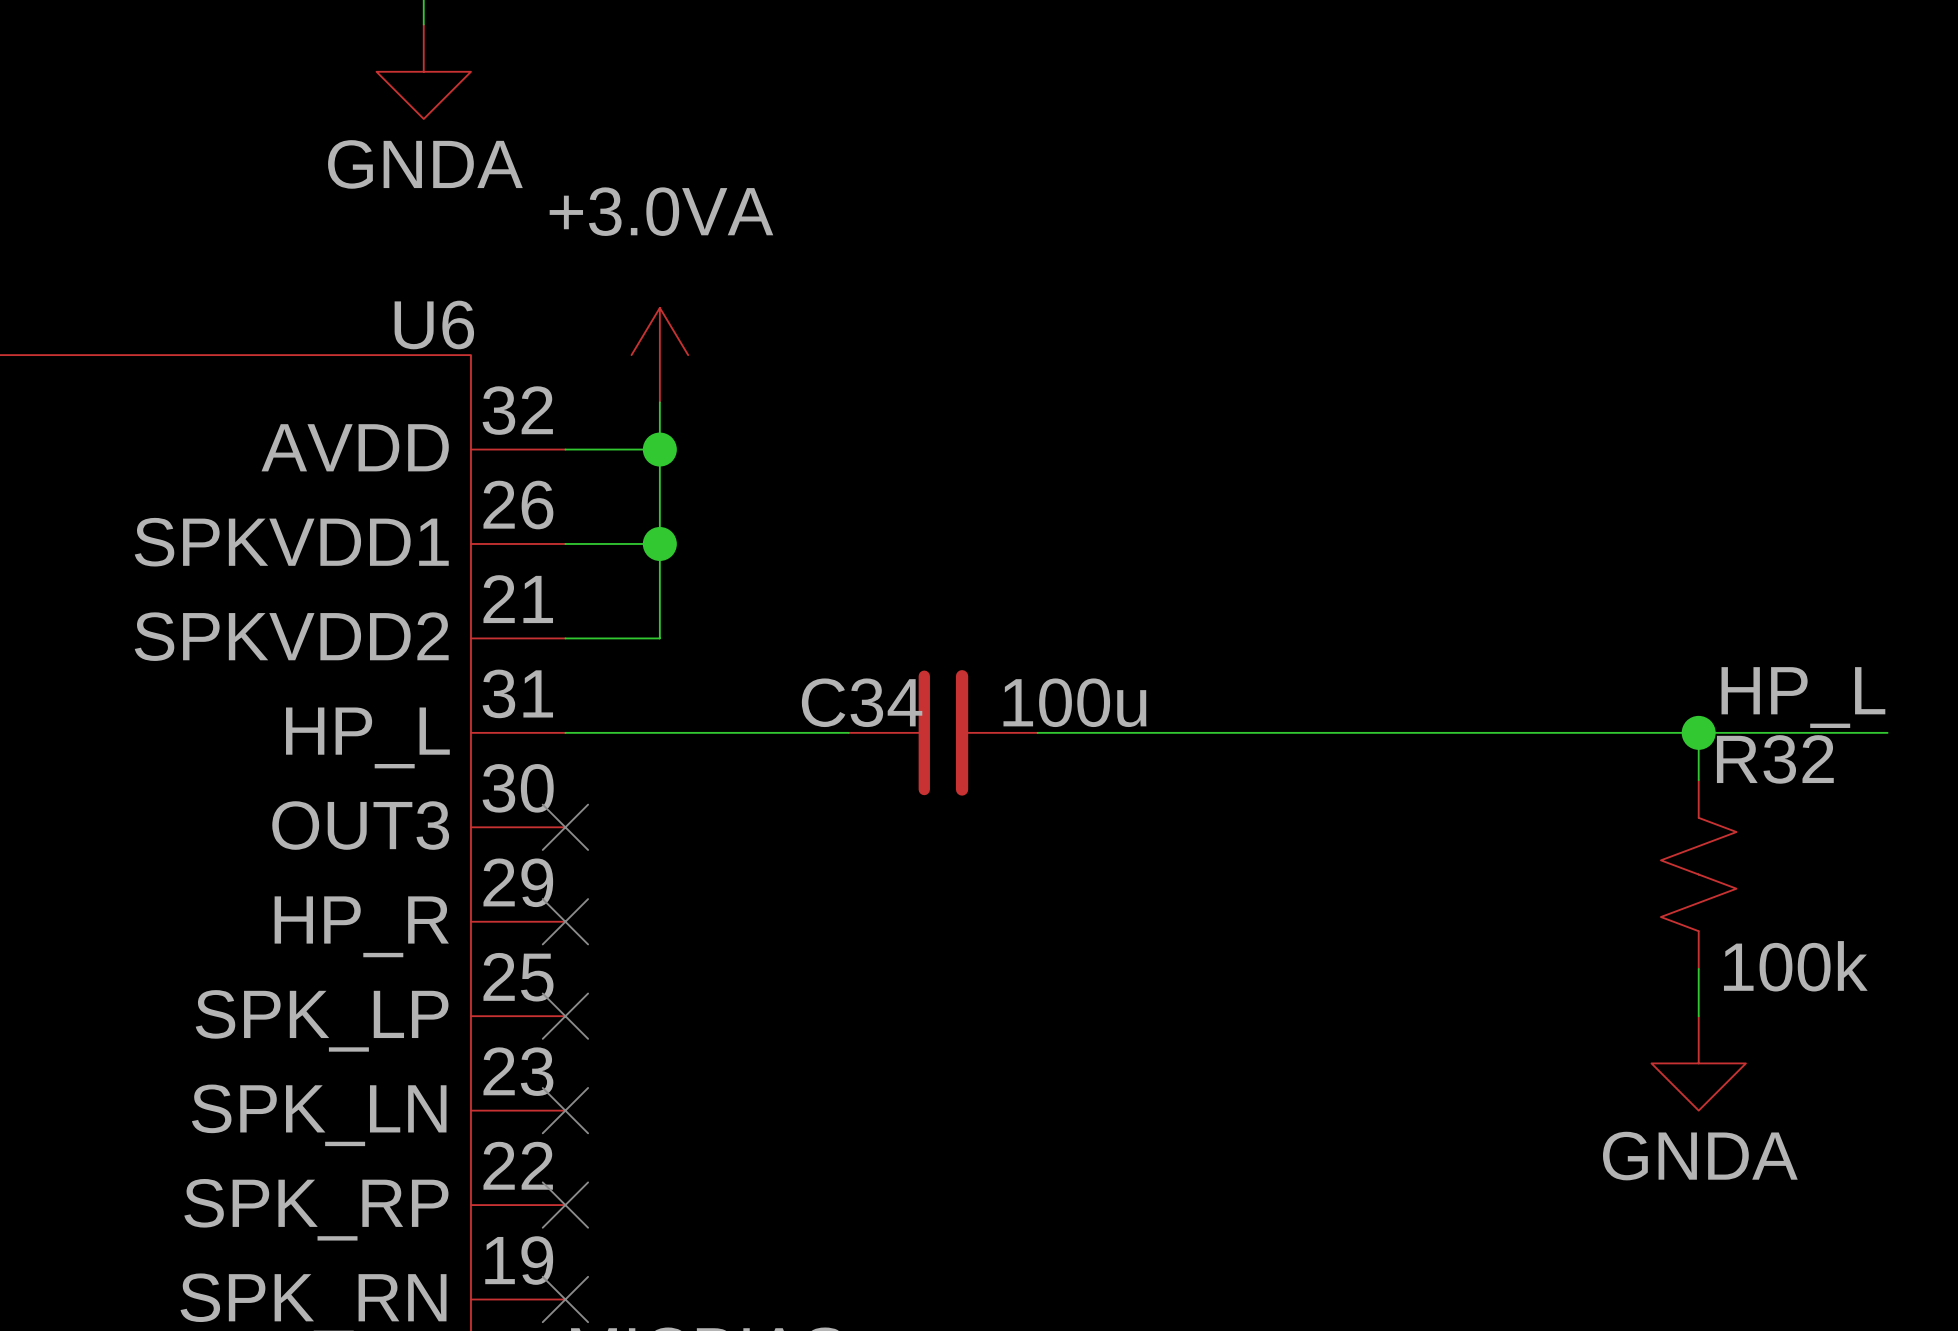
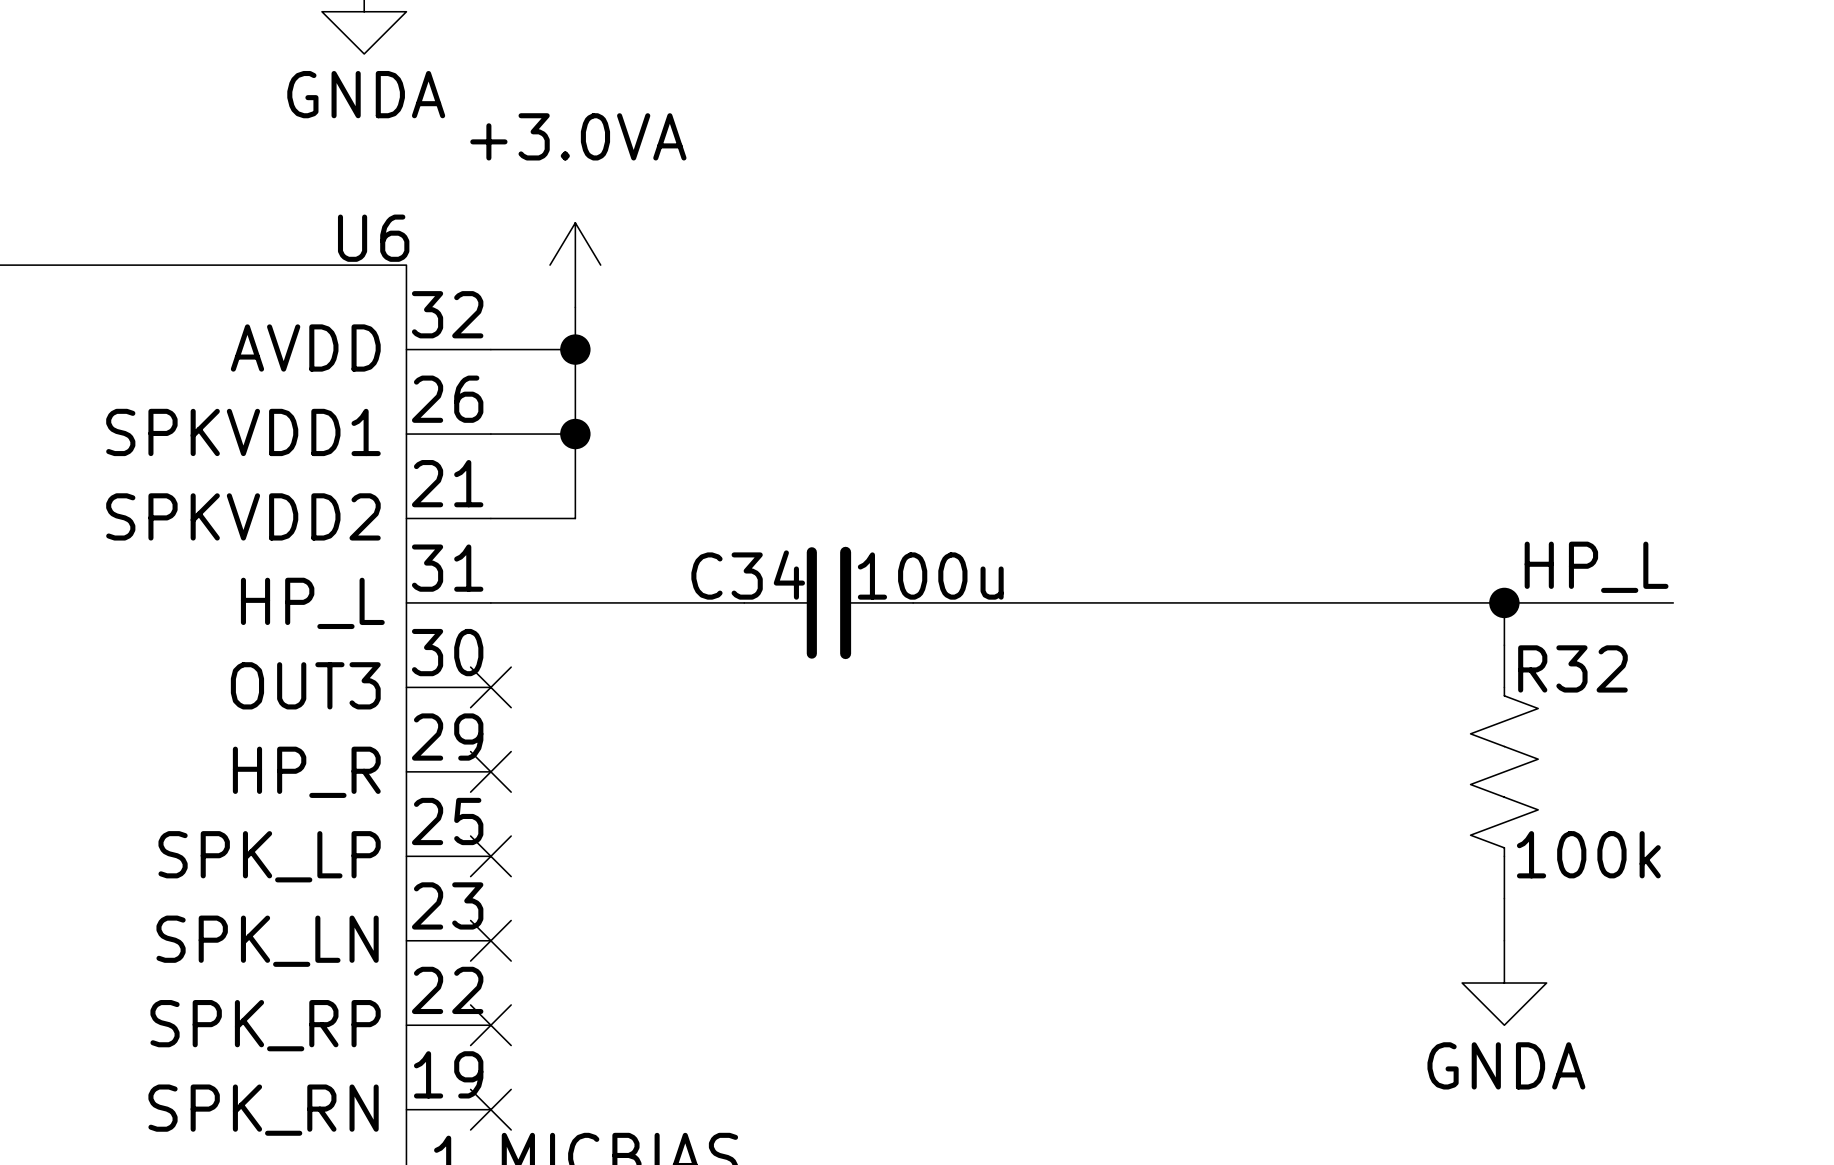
R32 symbol: [1660, 780, 1737, 969] -> [1470, 645, 1539, 899]
wire: (1698, 968) (1698, 1016) -> (1504, 898) (1504, 940)
power symbol position: GNDA (1698, 1063) -> GNDA (1504, 983)

